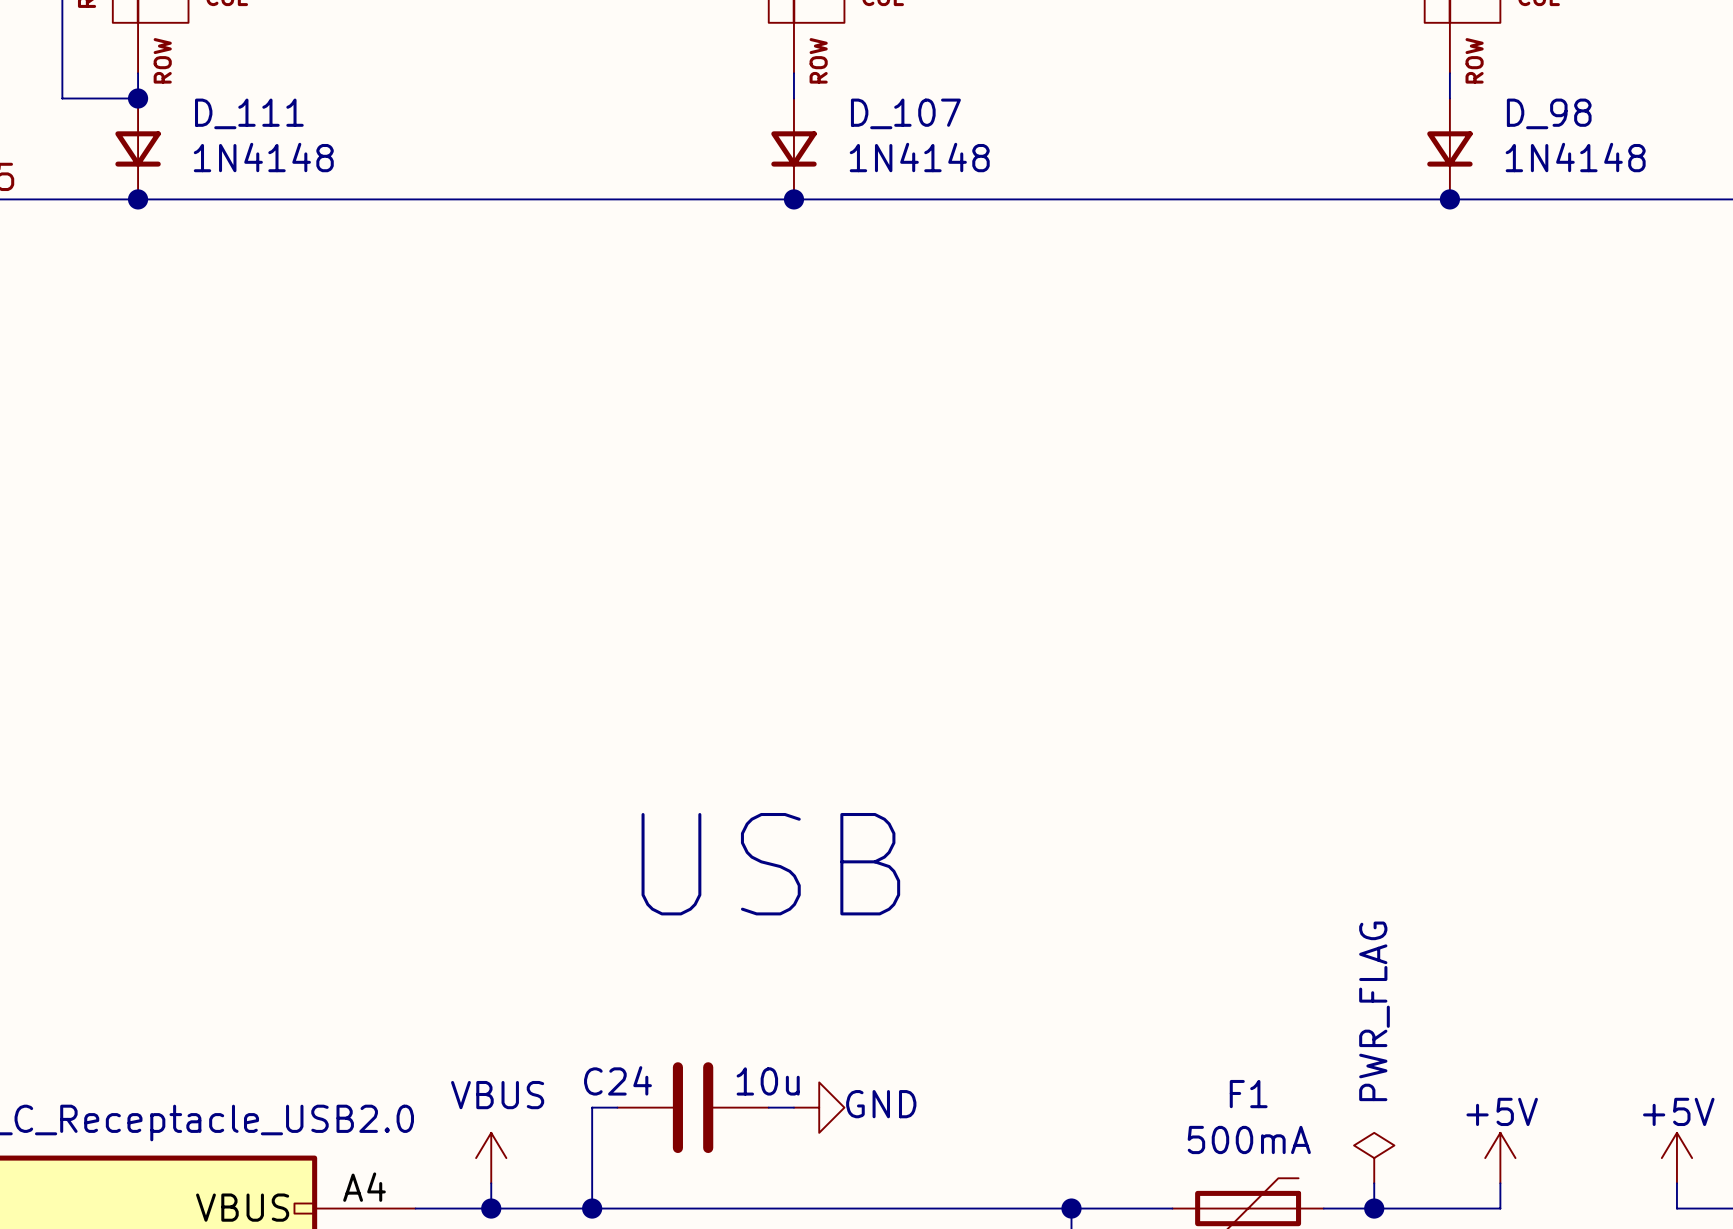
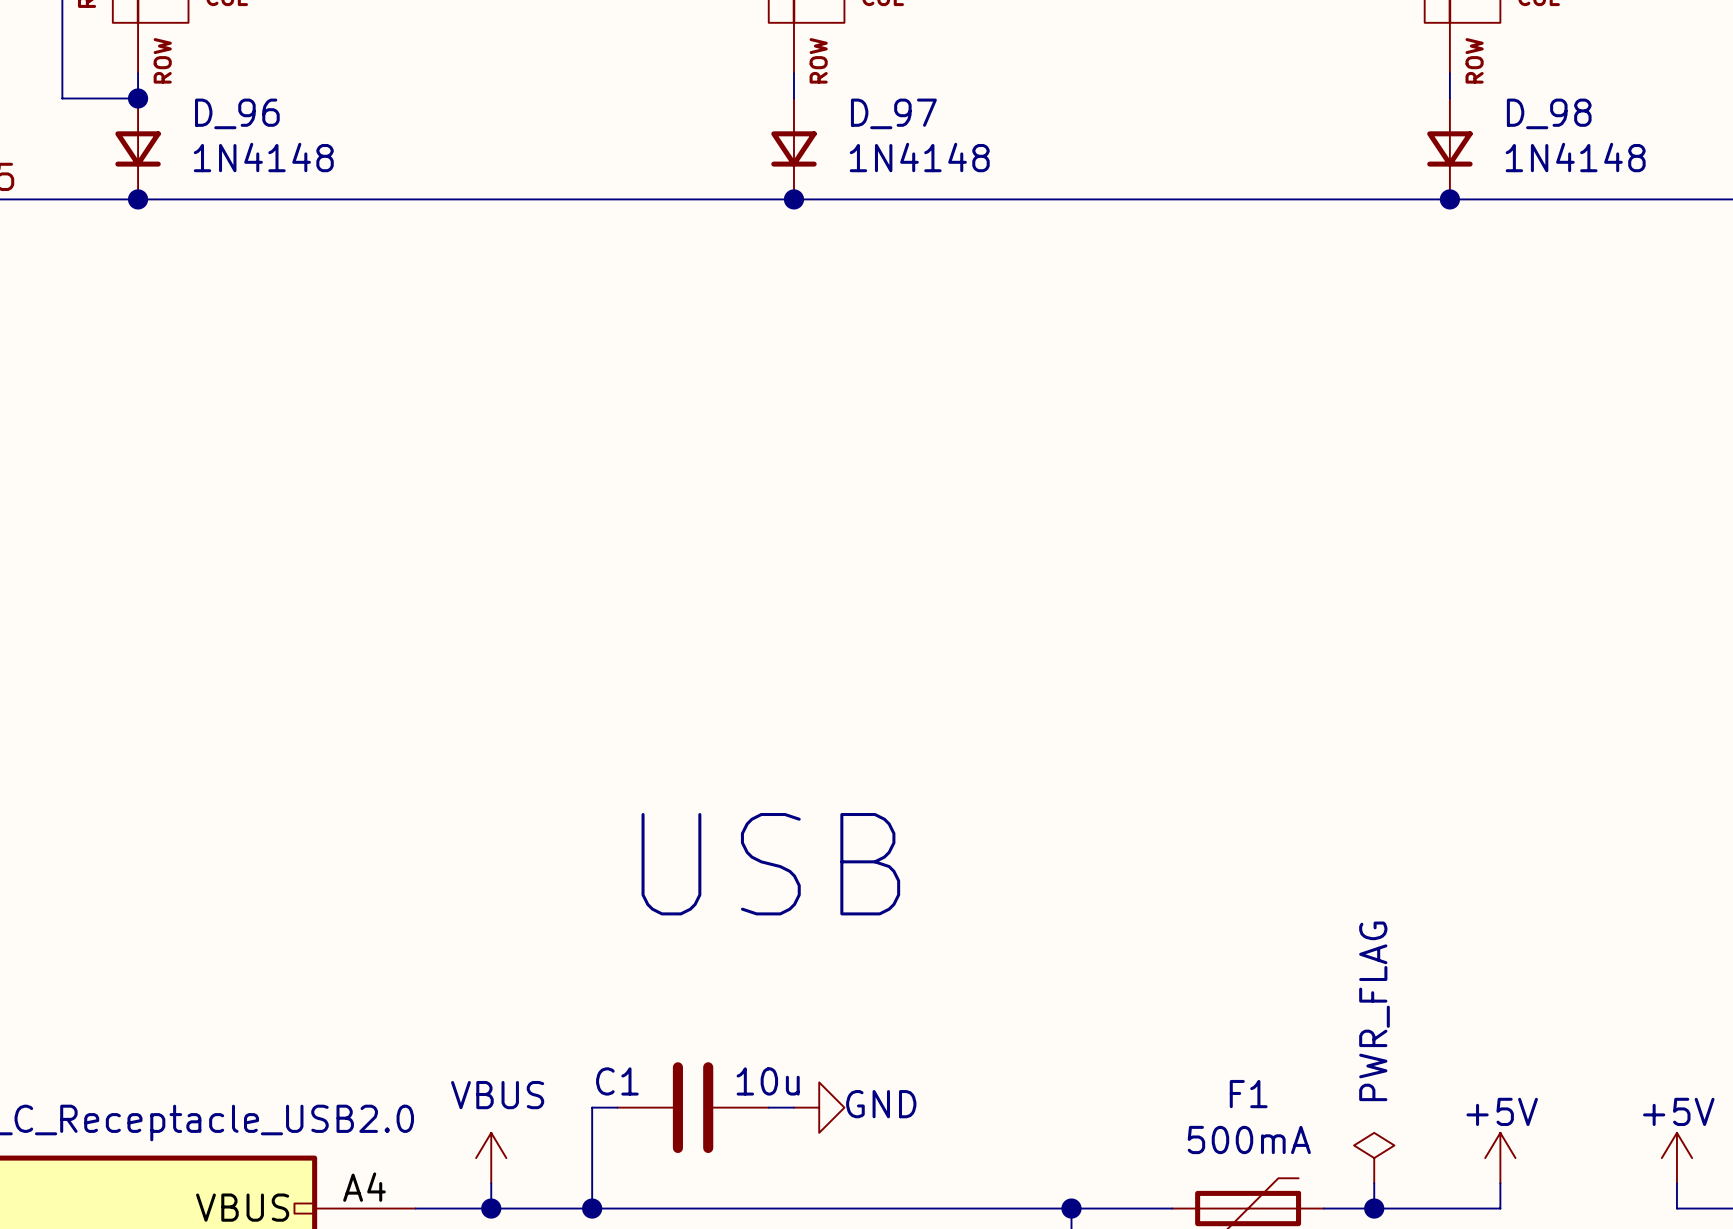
D_111 name: D_111 (249, 113) -> D_96 (237, 113)
D_107 name: D_107 (905, 113) -> D_97 (893, 113)
C24 name: C24 (617, 1080) -> C1 (617, 1081)

